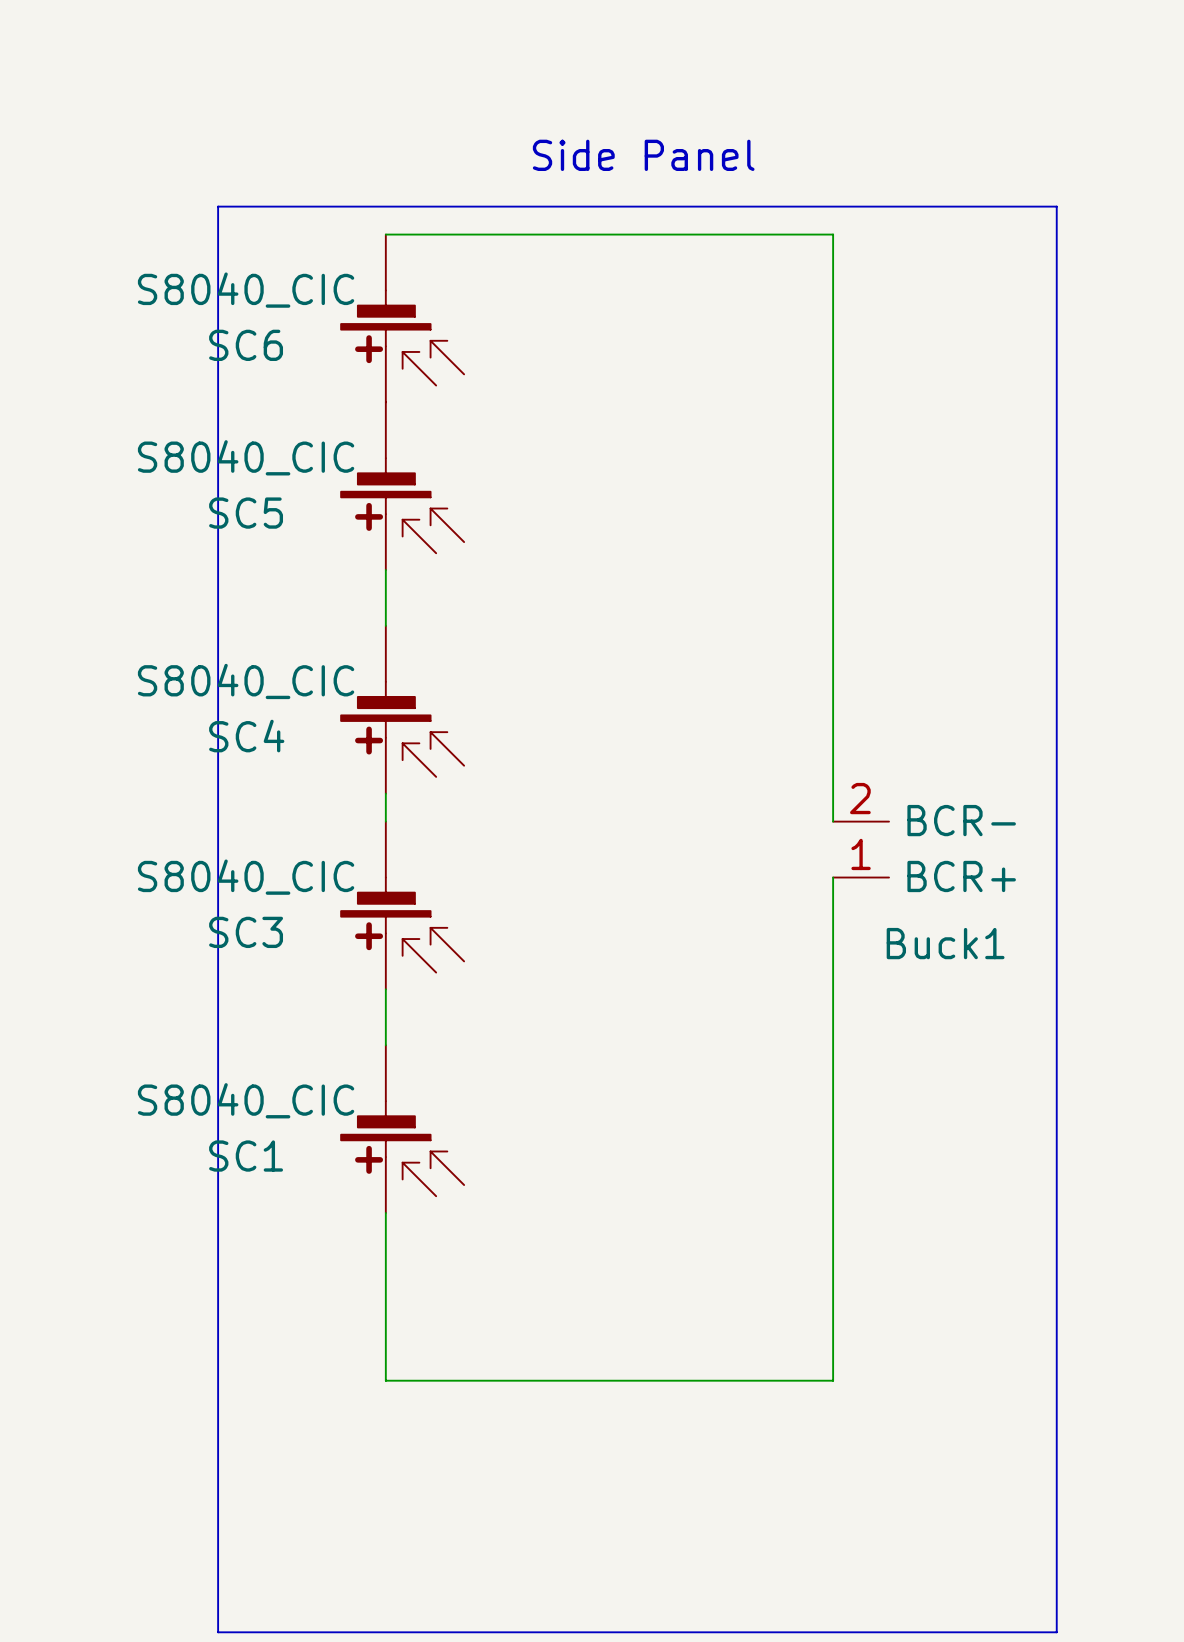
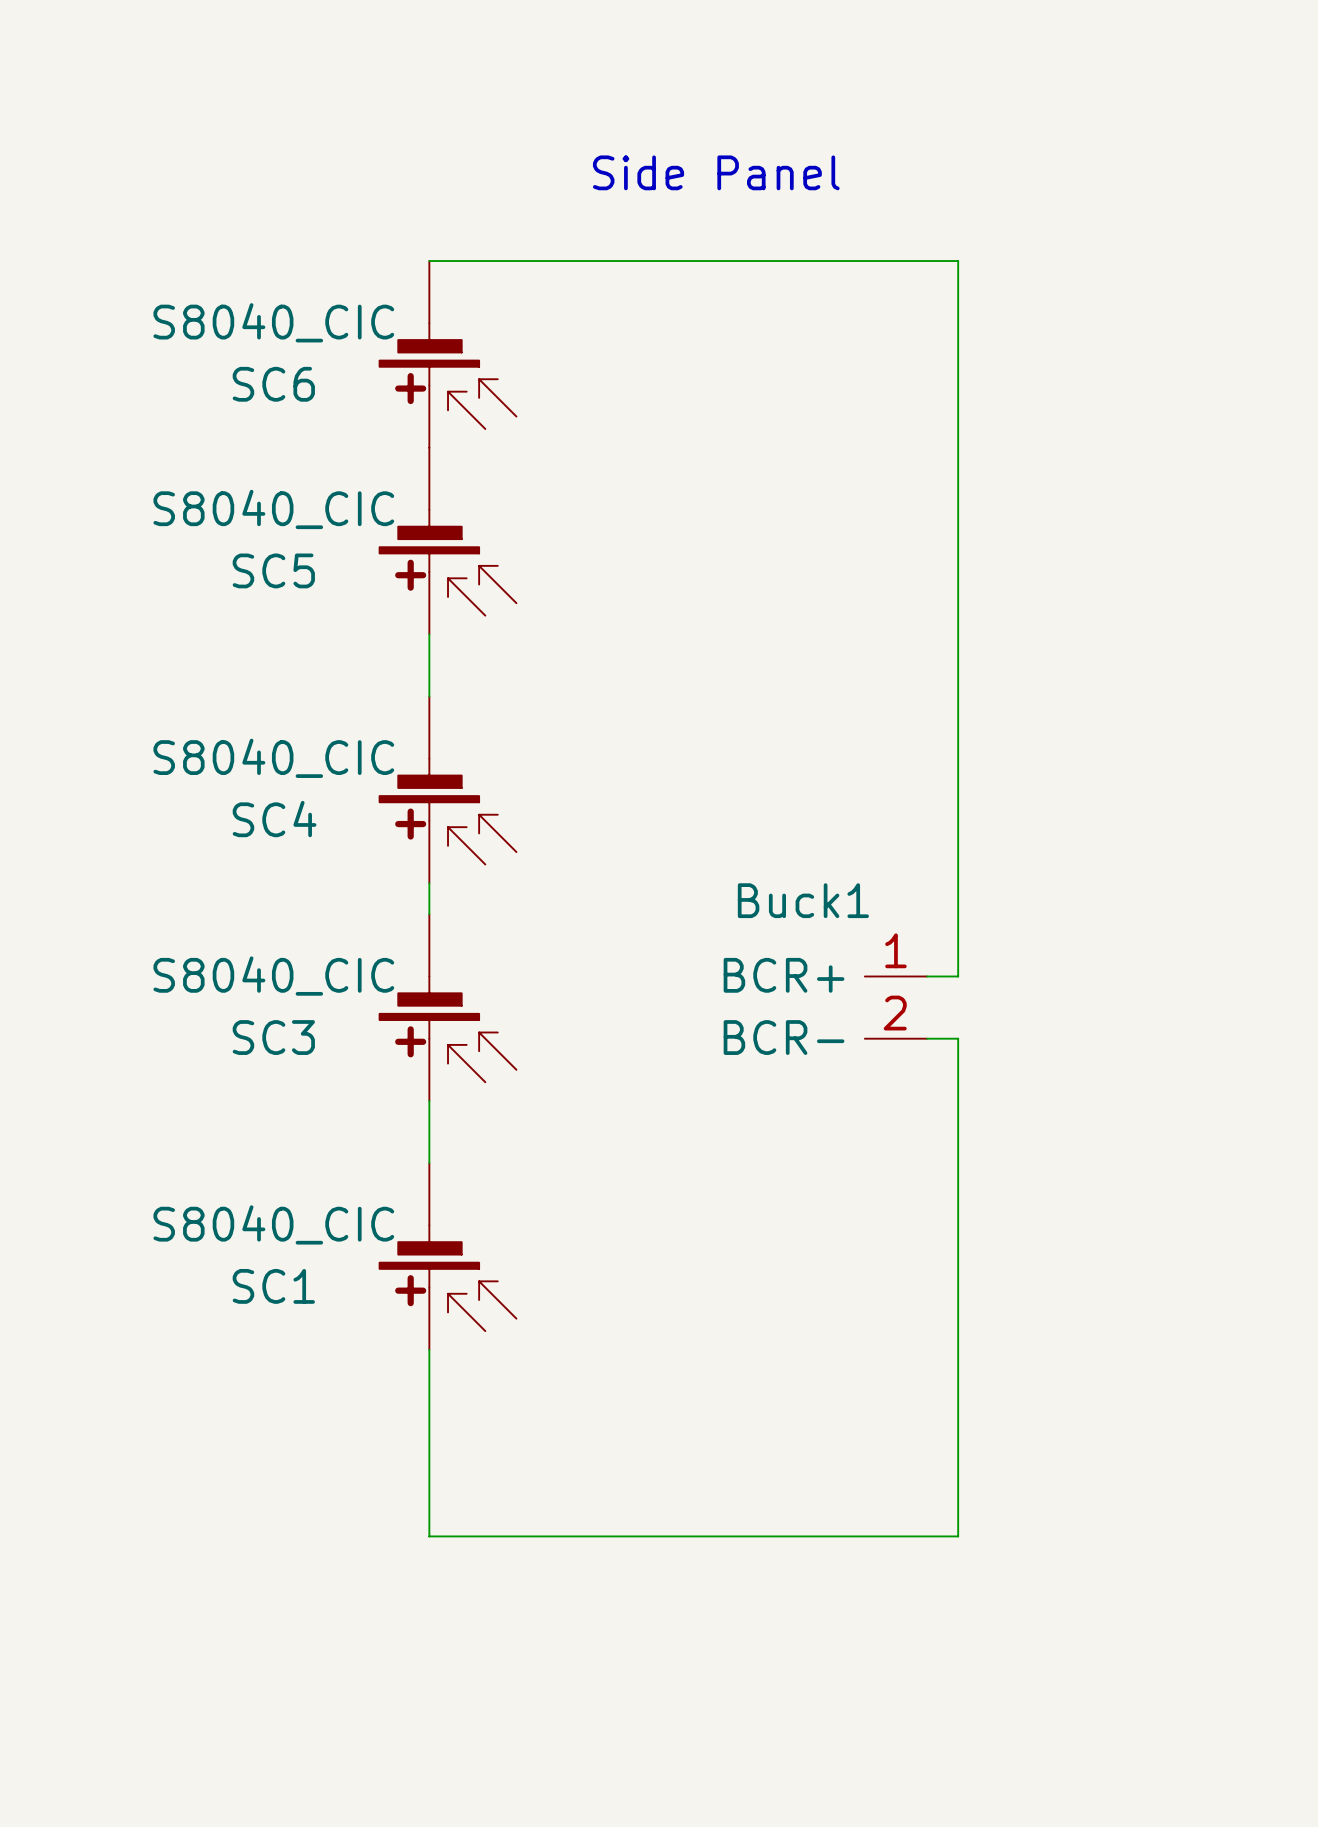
line: (218, 206) (1056, 206) (1056, 1632) (218, 1632) (218, 206) -> none
wire: (833, 234) (833, 821) -> (927, 261) (958, 261) (958, 976) (927, 976)
Buck1 rotation: 0° (861, 849) -> 180° (895, 1007)
Buck1 position: (861, 849) -> (895, 1007)
wire: (833, 877) (833, 1380) -> (927, 1038) (958, 1038) (958, 1536) (927, 1536)

